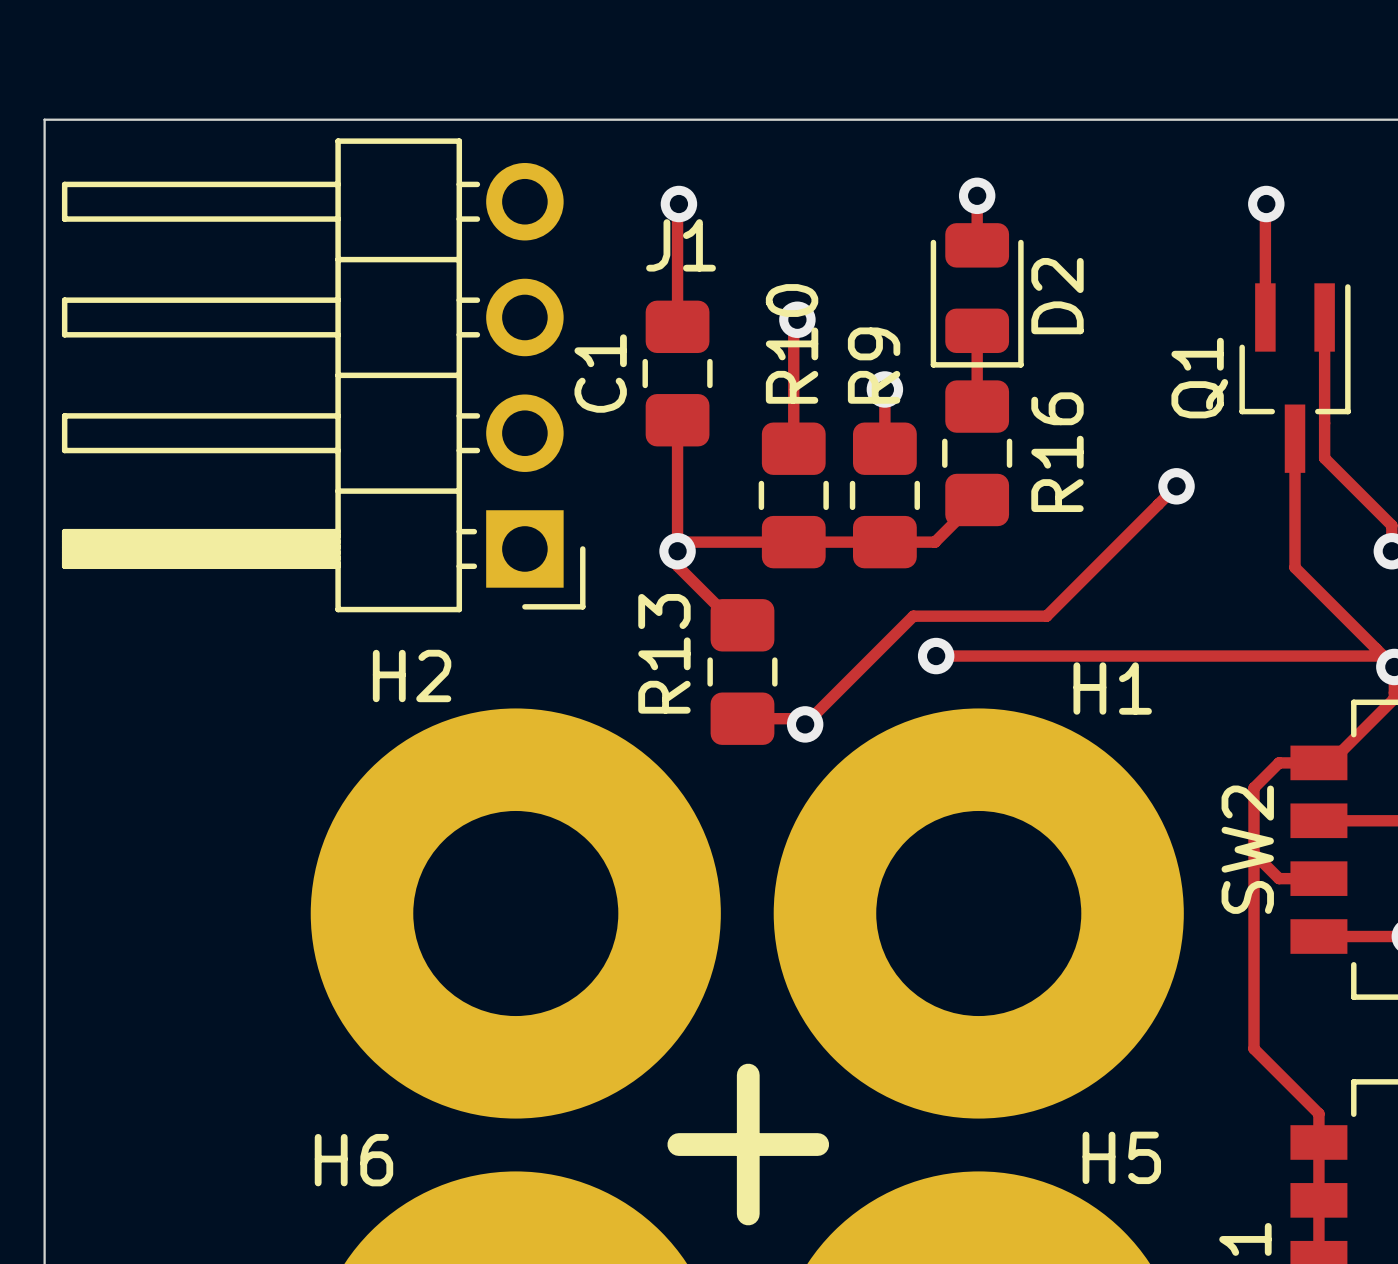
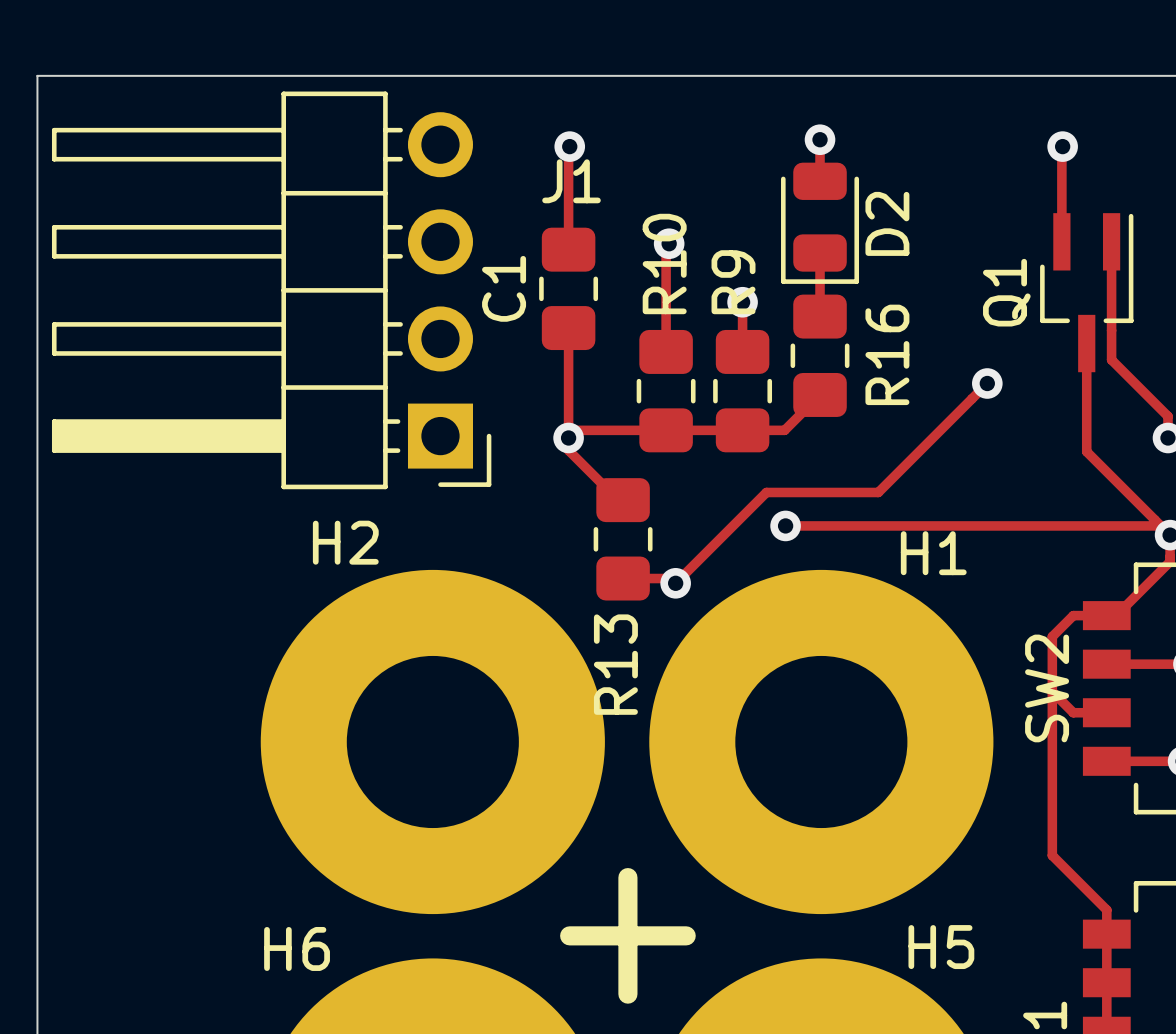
R13 name position: R13 (664, 653) -> R13 (615, 664)

